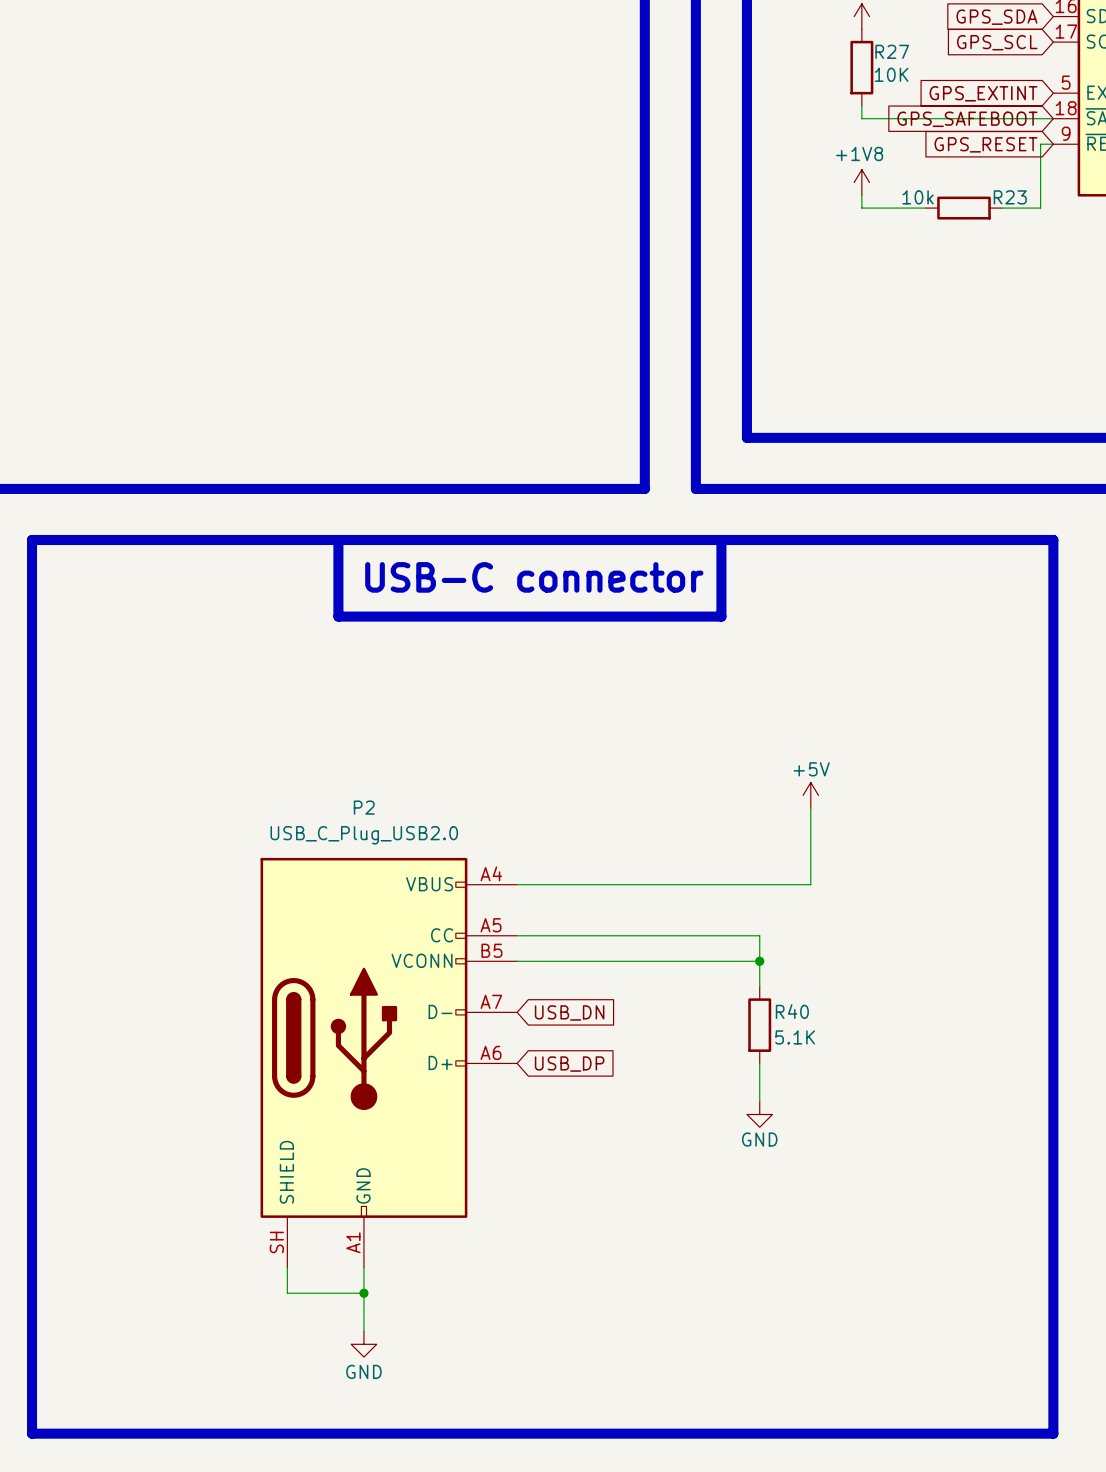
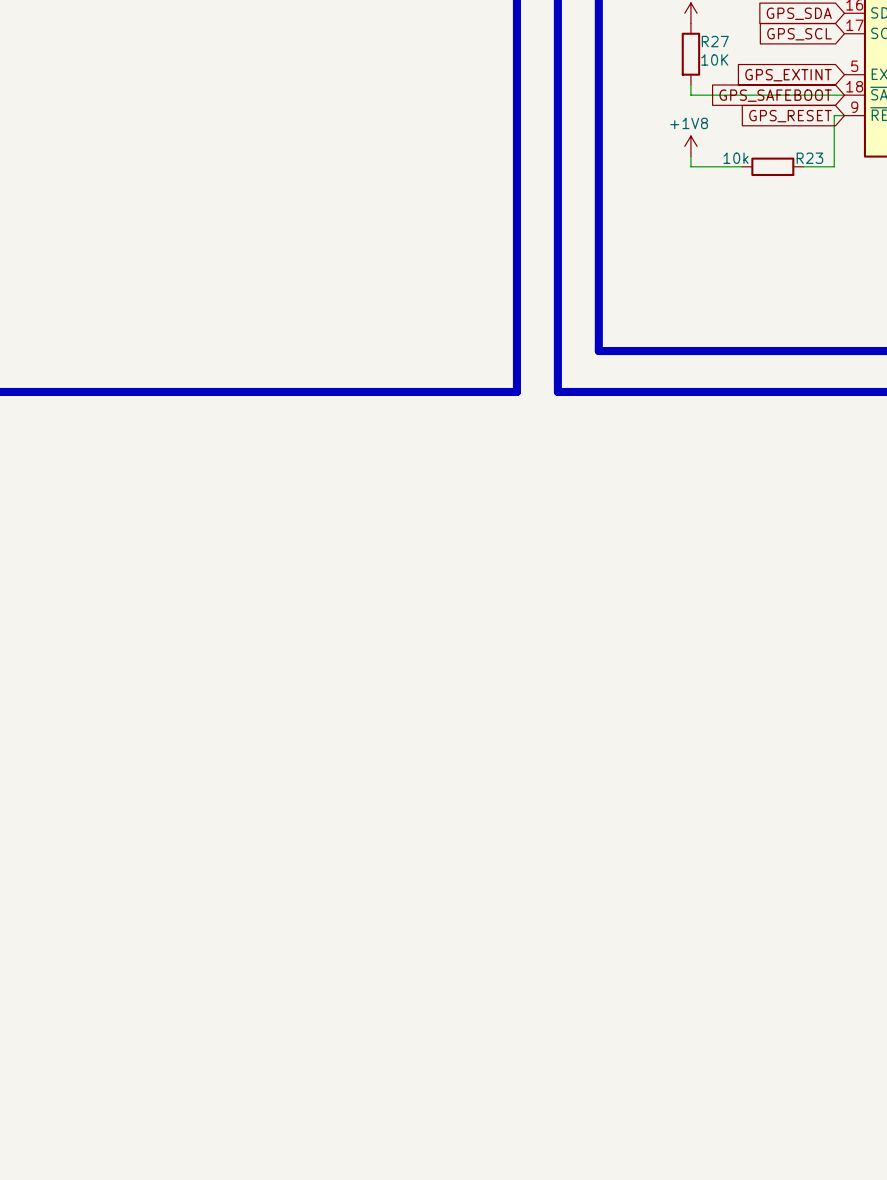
line: (32, 540) (1053, 540) (1053, 1433) (32, 1433) (32, 540) -> none
line: (338, 540) (338, 616) (721, 616) (721, 540) -> none
text: USB-C connector (534, 577) -> none
power symbol: +5V (810, 795) -> none
wire: (810, 808) (810, 884) (517, 884) -> none
wire: (517, 935) (759, 935) (759, 986) -> none
wire: (517, 961) (759, 961) -> none
junction: (759, 961) -> none
global label: USB_DN (569, 1012) -> none
R40: 5.1K (759, 1025) -> none
P2: USB_C_Plug_USB2.0 (388, 1062) -> none
wire: (759, 1063) (759, 1101) -> none
global label: USB_DP (569, 1064) -> none
power symbol: GND (759, 1114) -> none
wire: (287, 1267) (287, 1293) (363, 1293) -> none
wire: (363, 1267) (363, 1331) -> none
junction: (363, 1293) -> none
power symbol: GND (363, 1344) -> none

